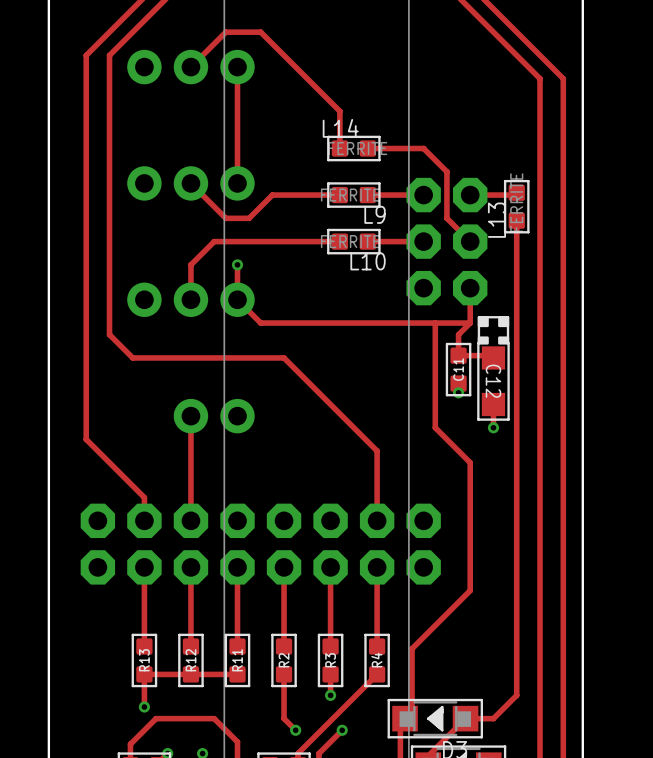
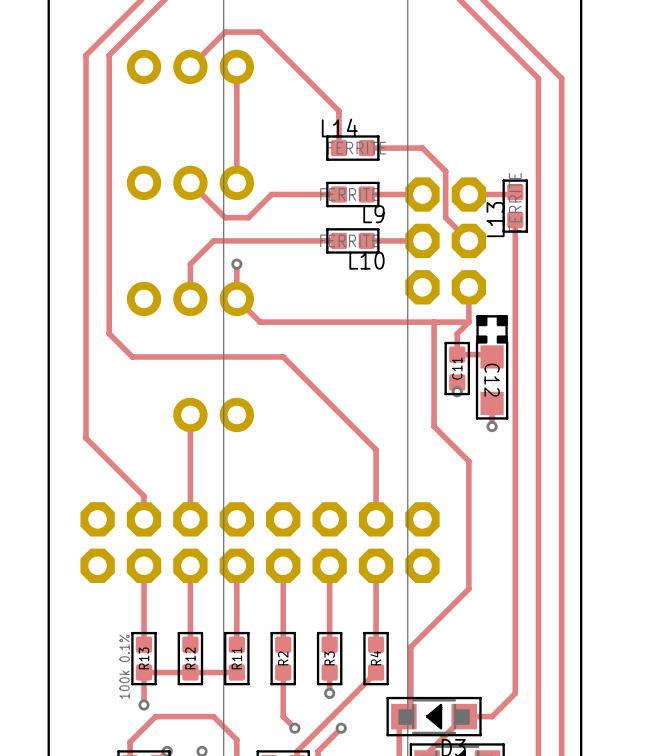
R13 value: none -> 100k 0.1% (124, 666)

